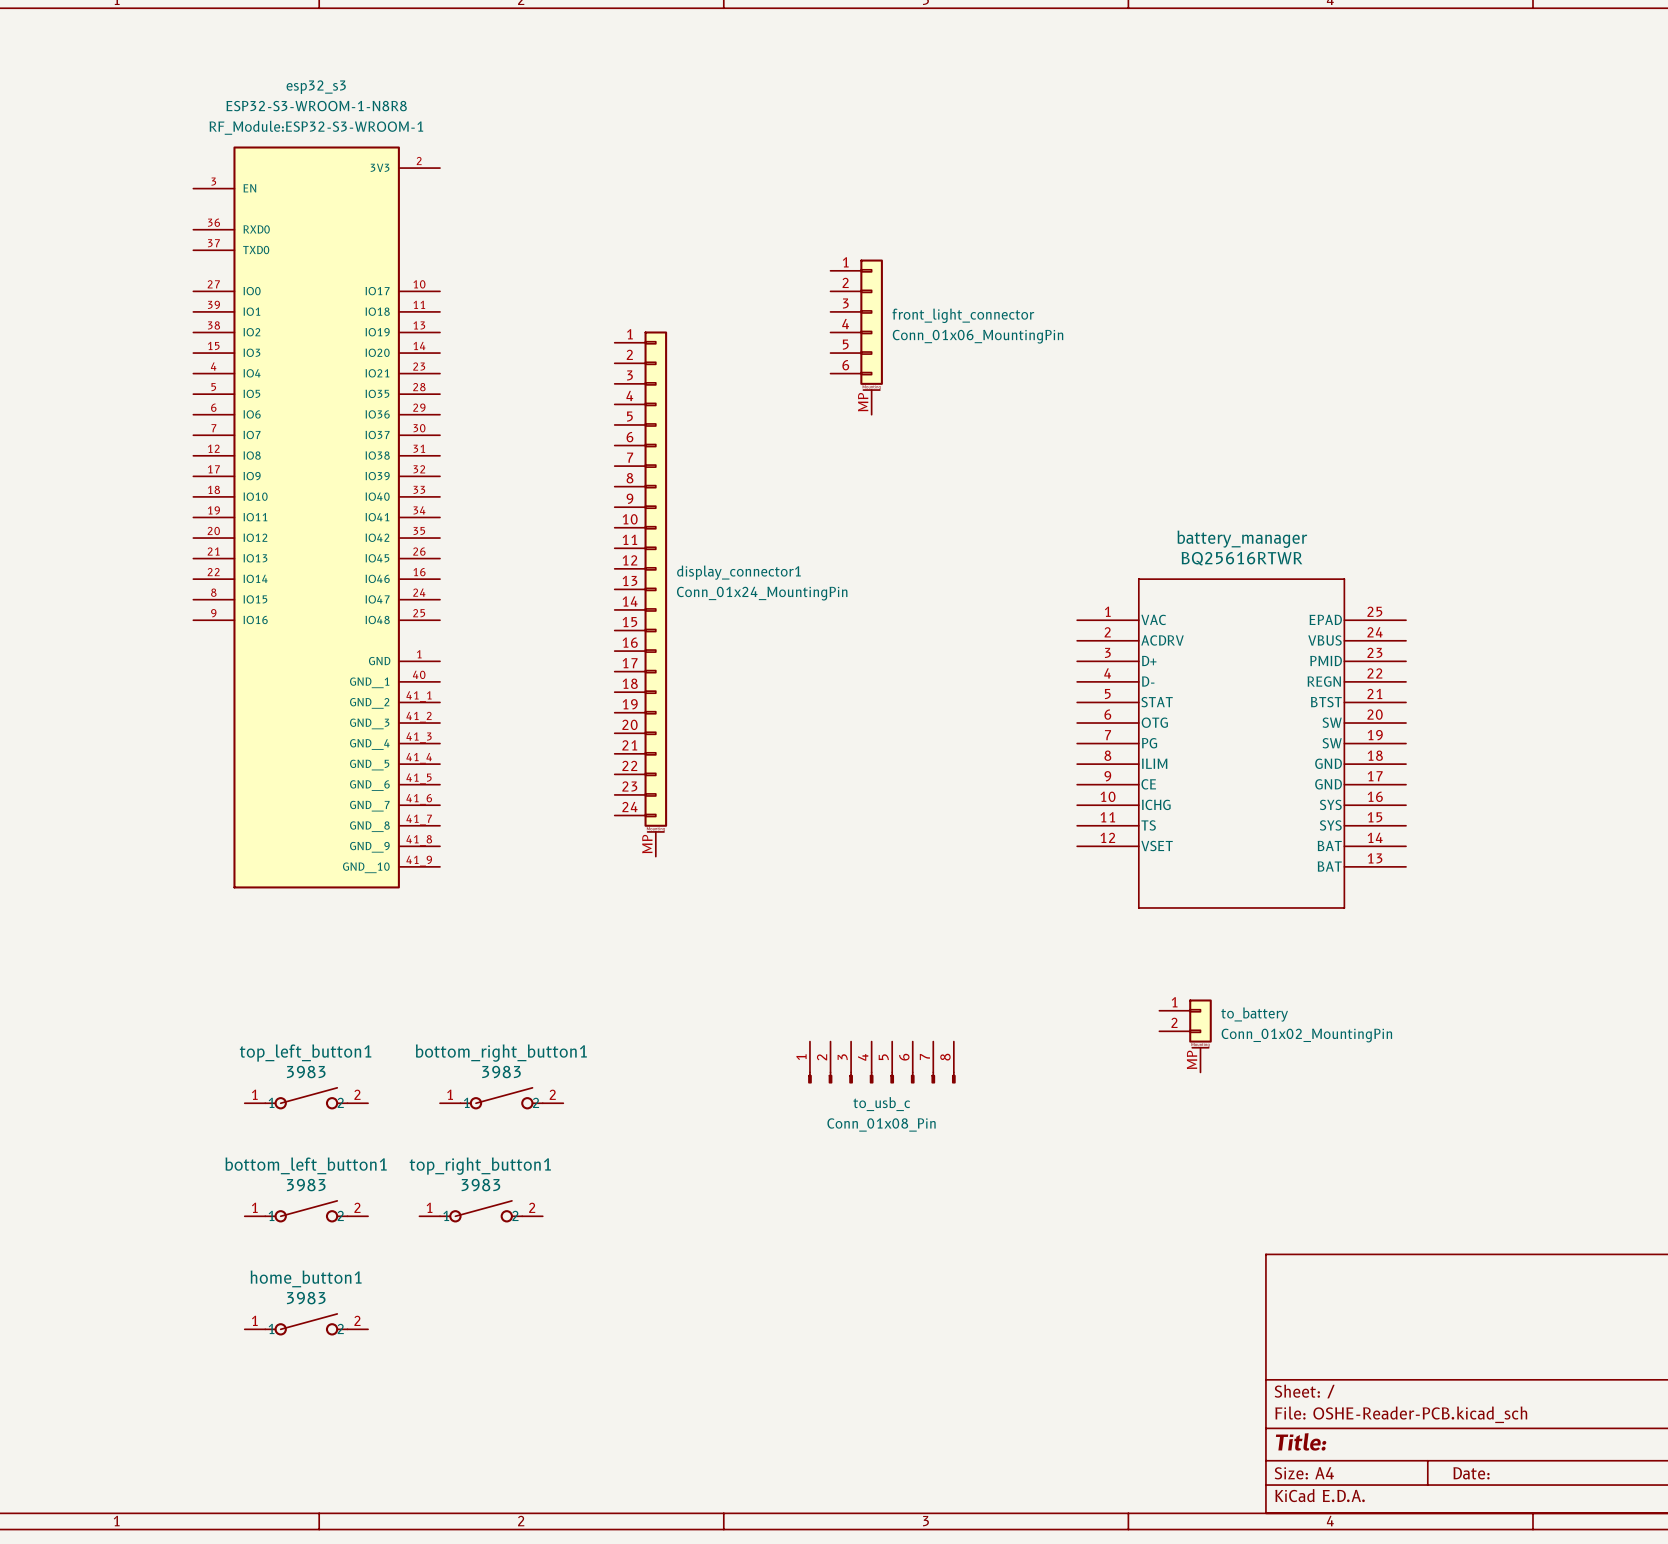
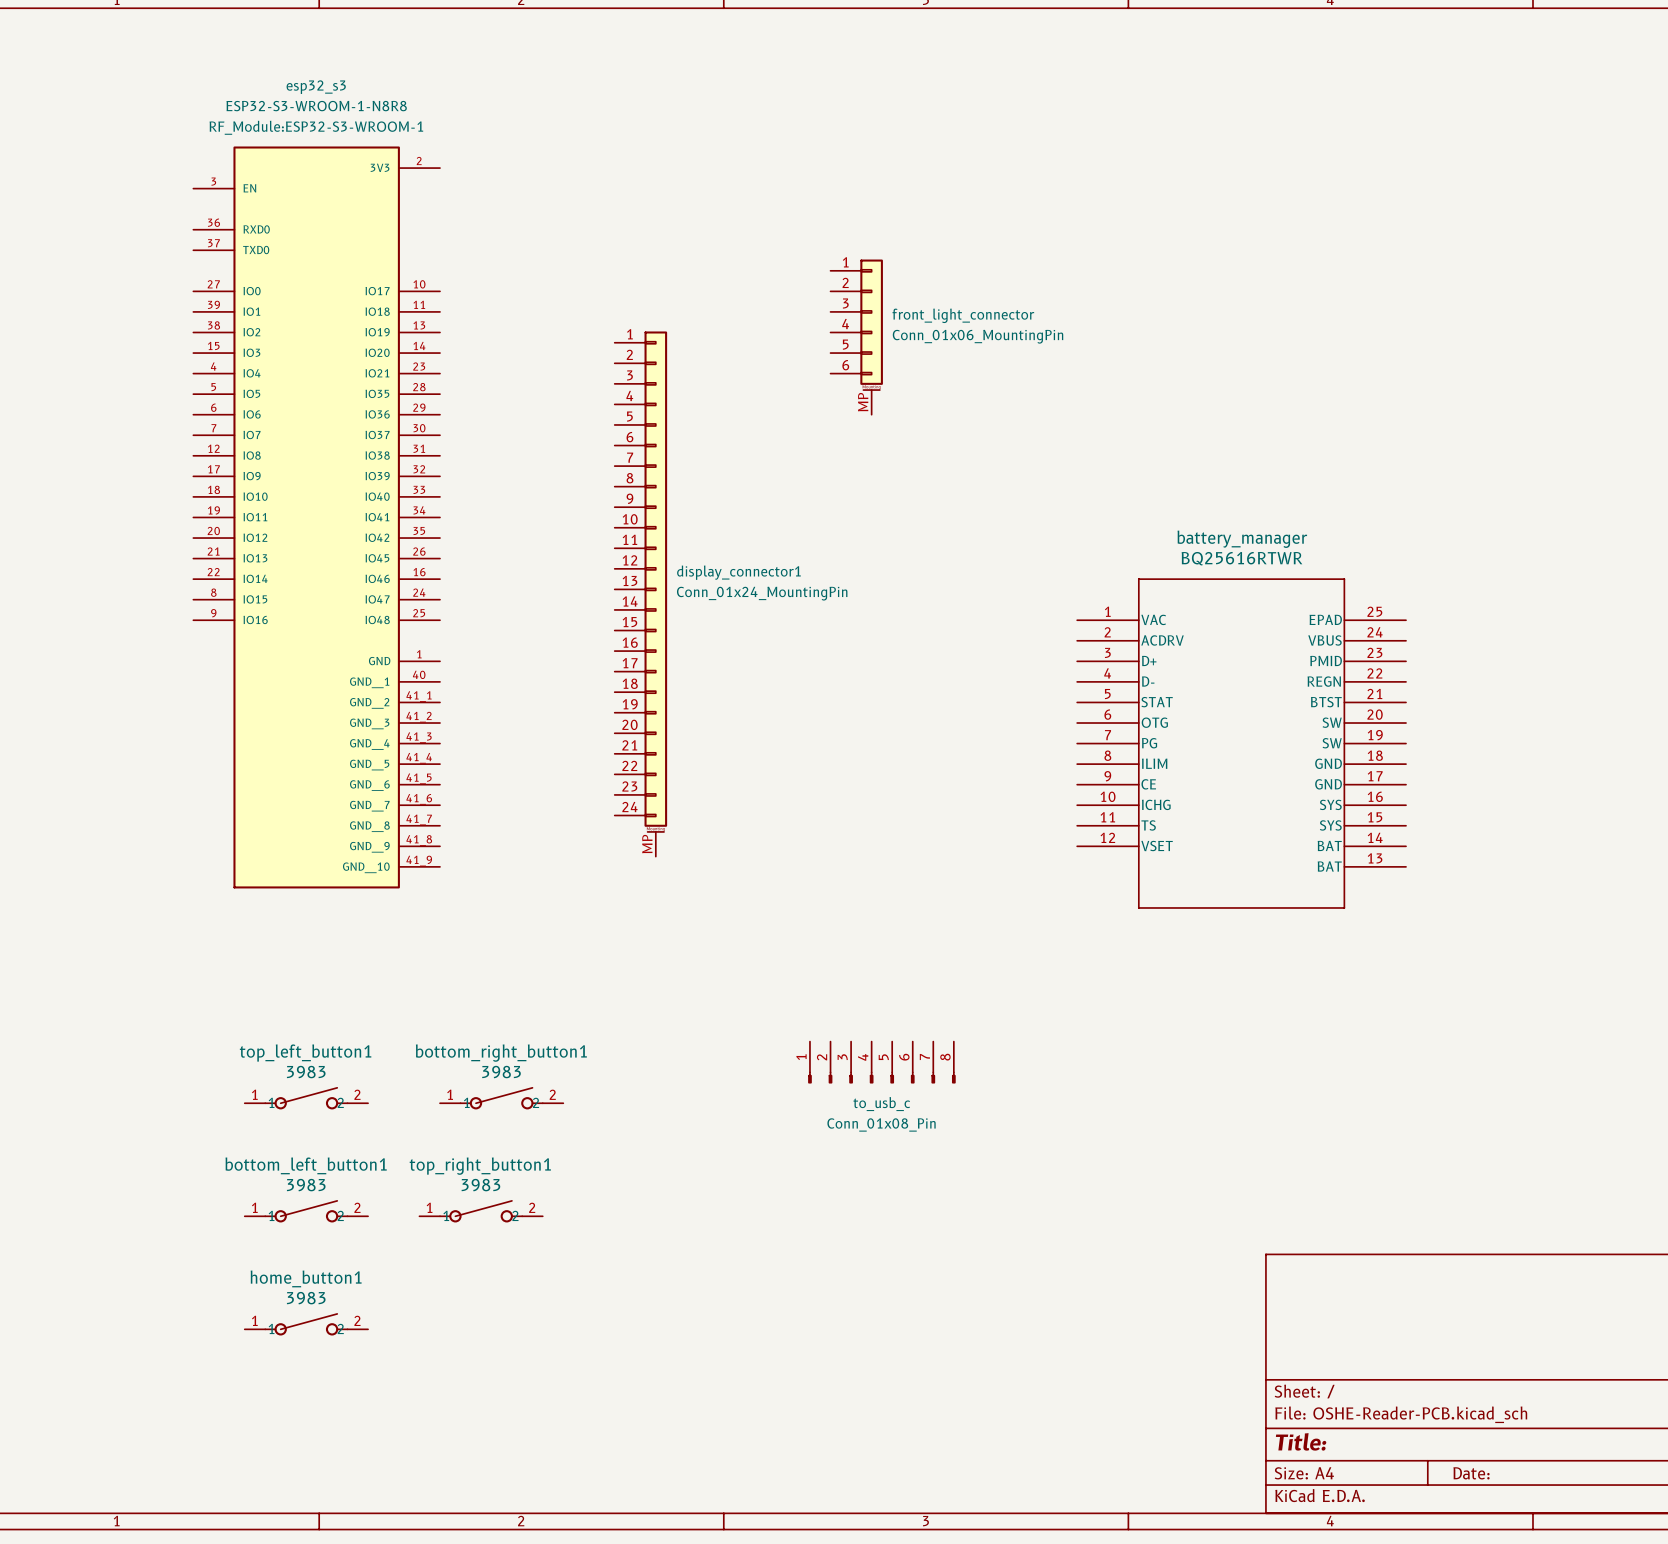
to_battery: Conn_01x02_MountingPin (1185, 1035) -> none

